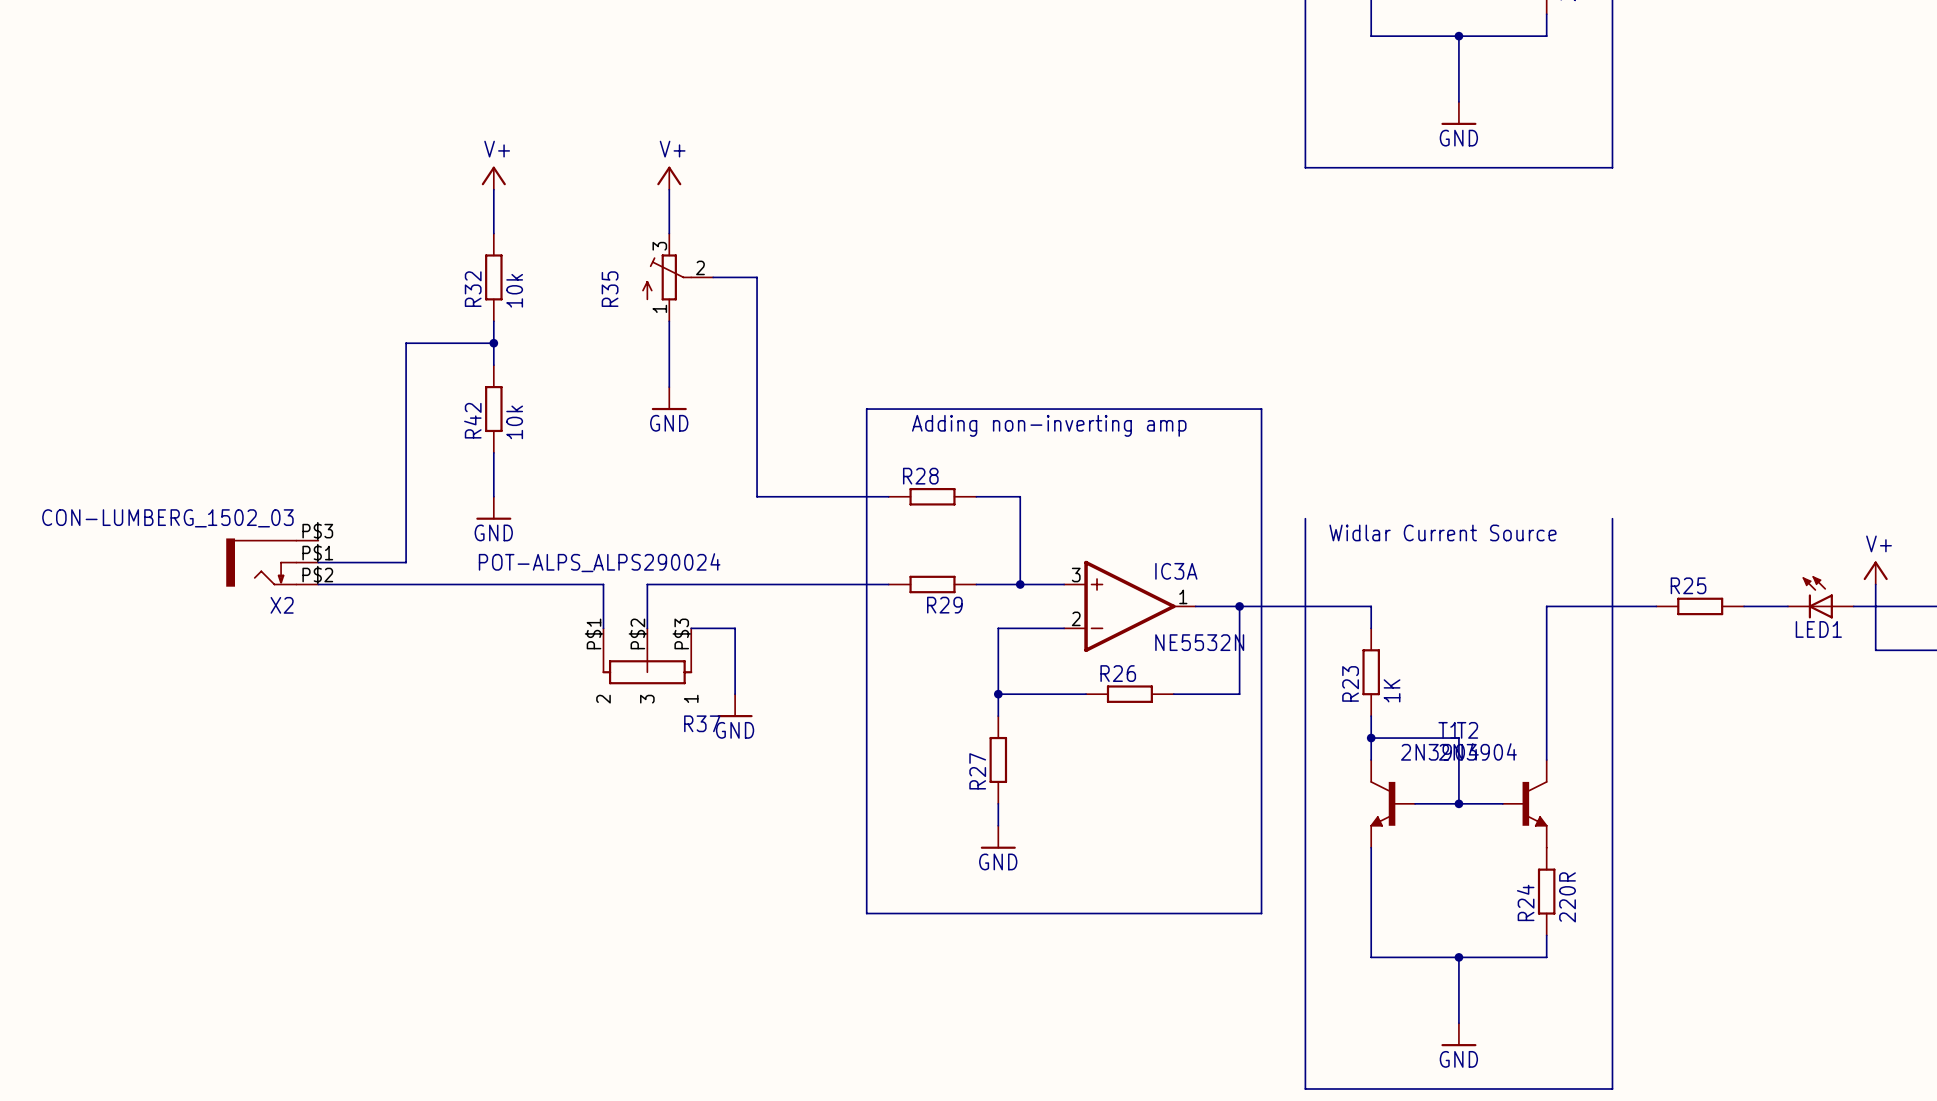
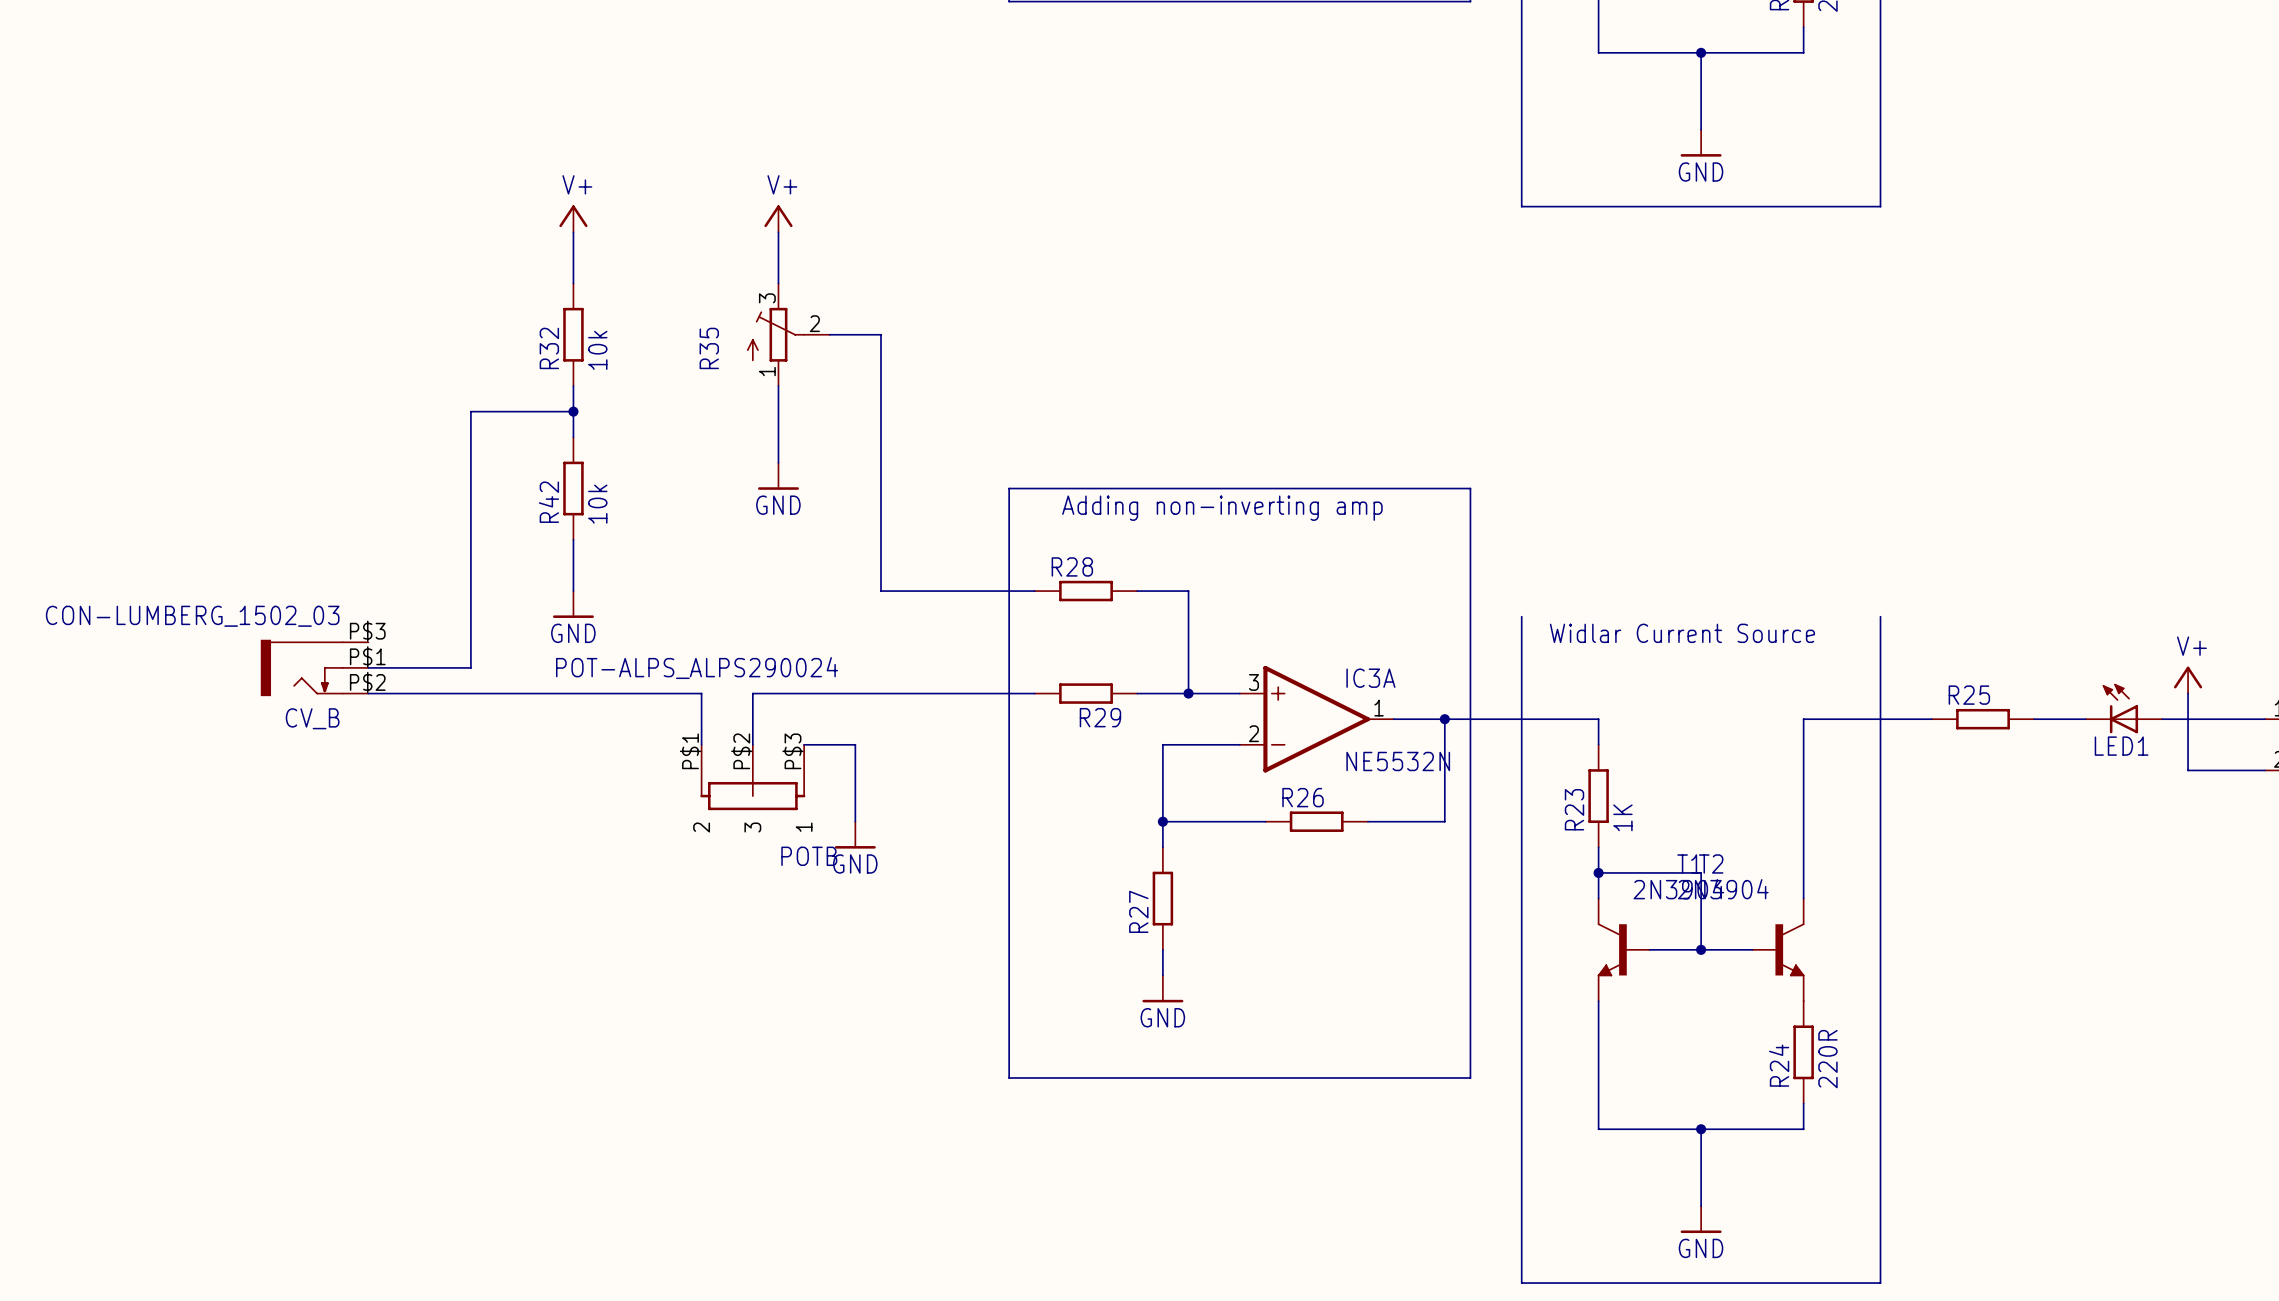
X2 name: X2 (282, 605) -> CV_B (312, 718)
R37 name: R37 (702, 723) -> POTB (809, 856)

